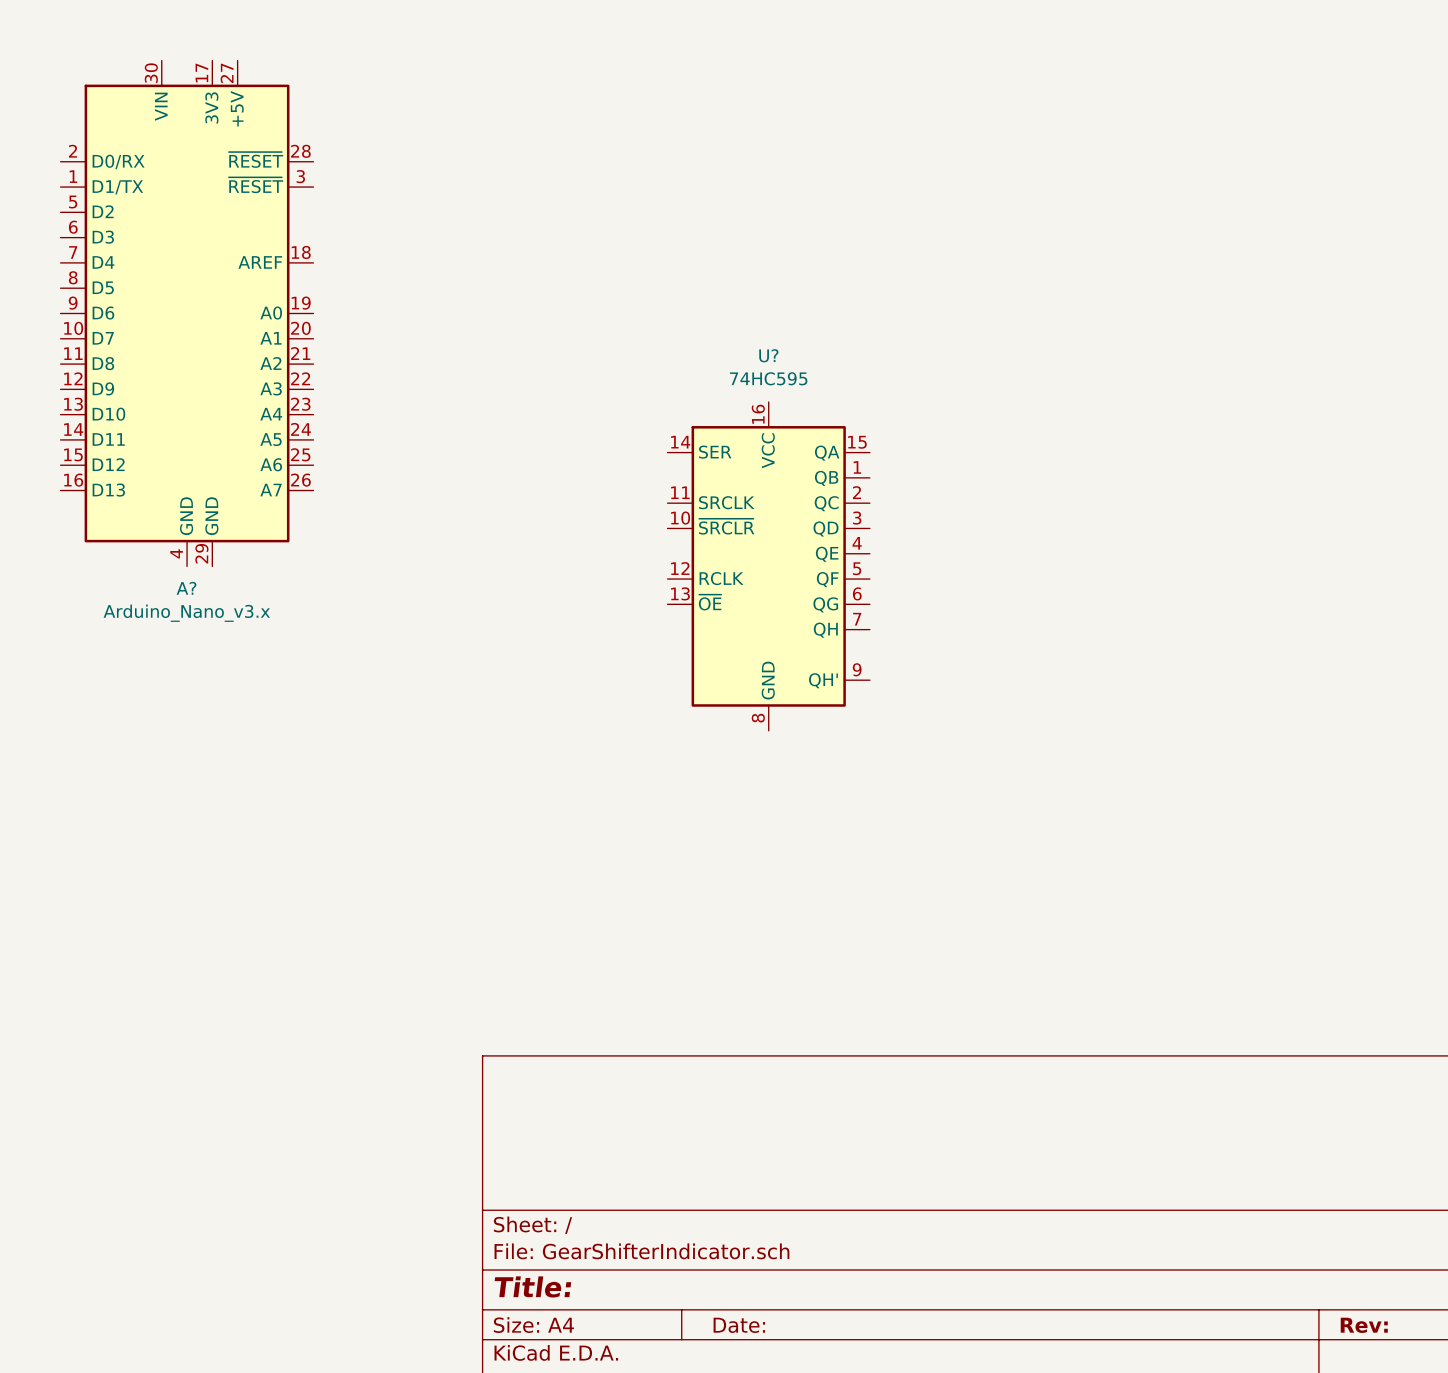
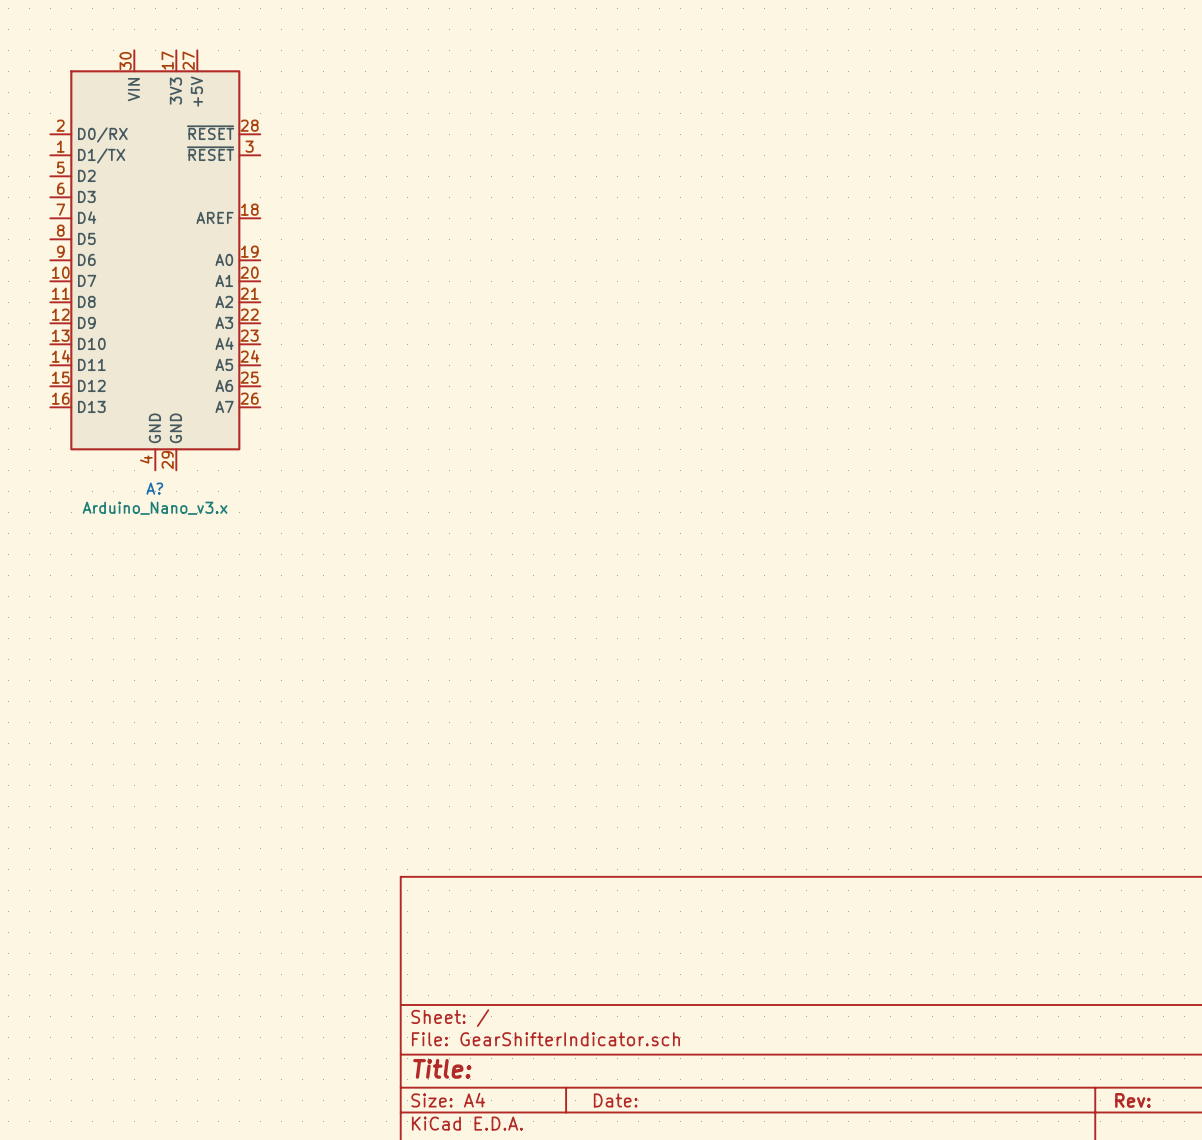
U?: 74HC595 (768, 566) -> none

